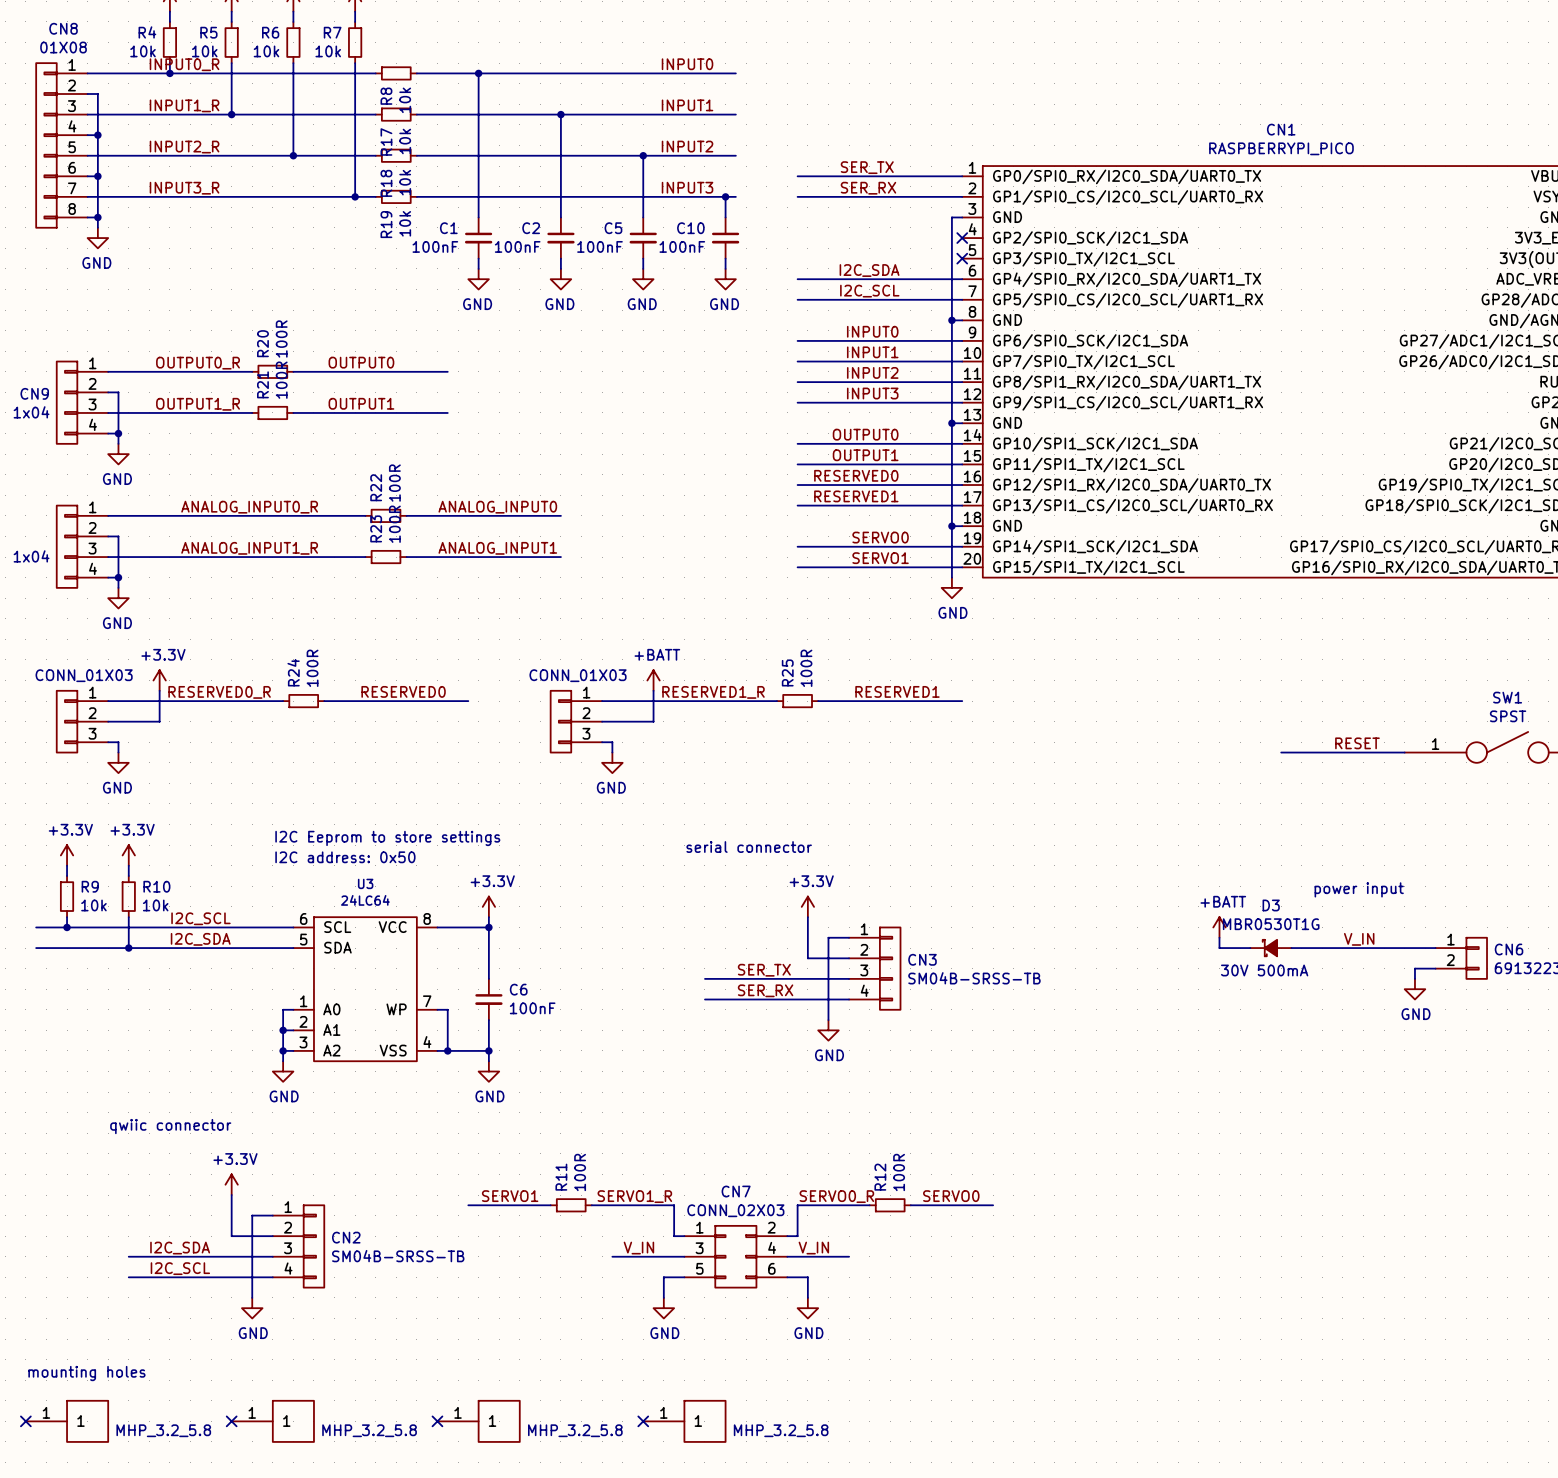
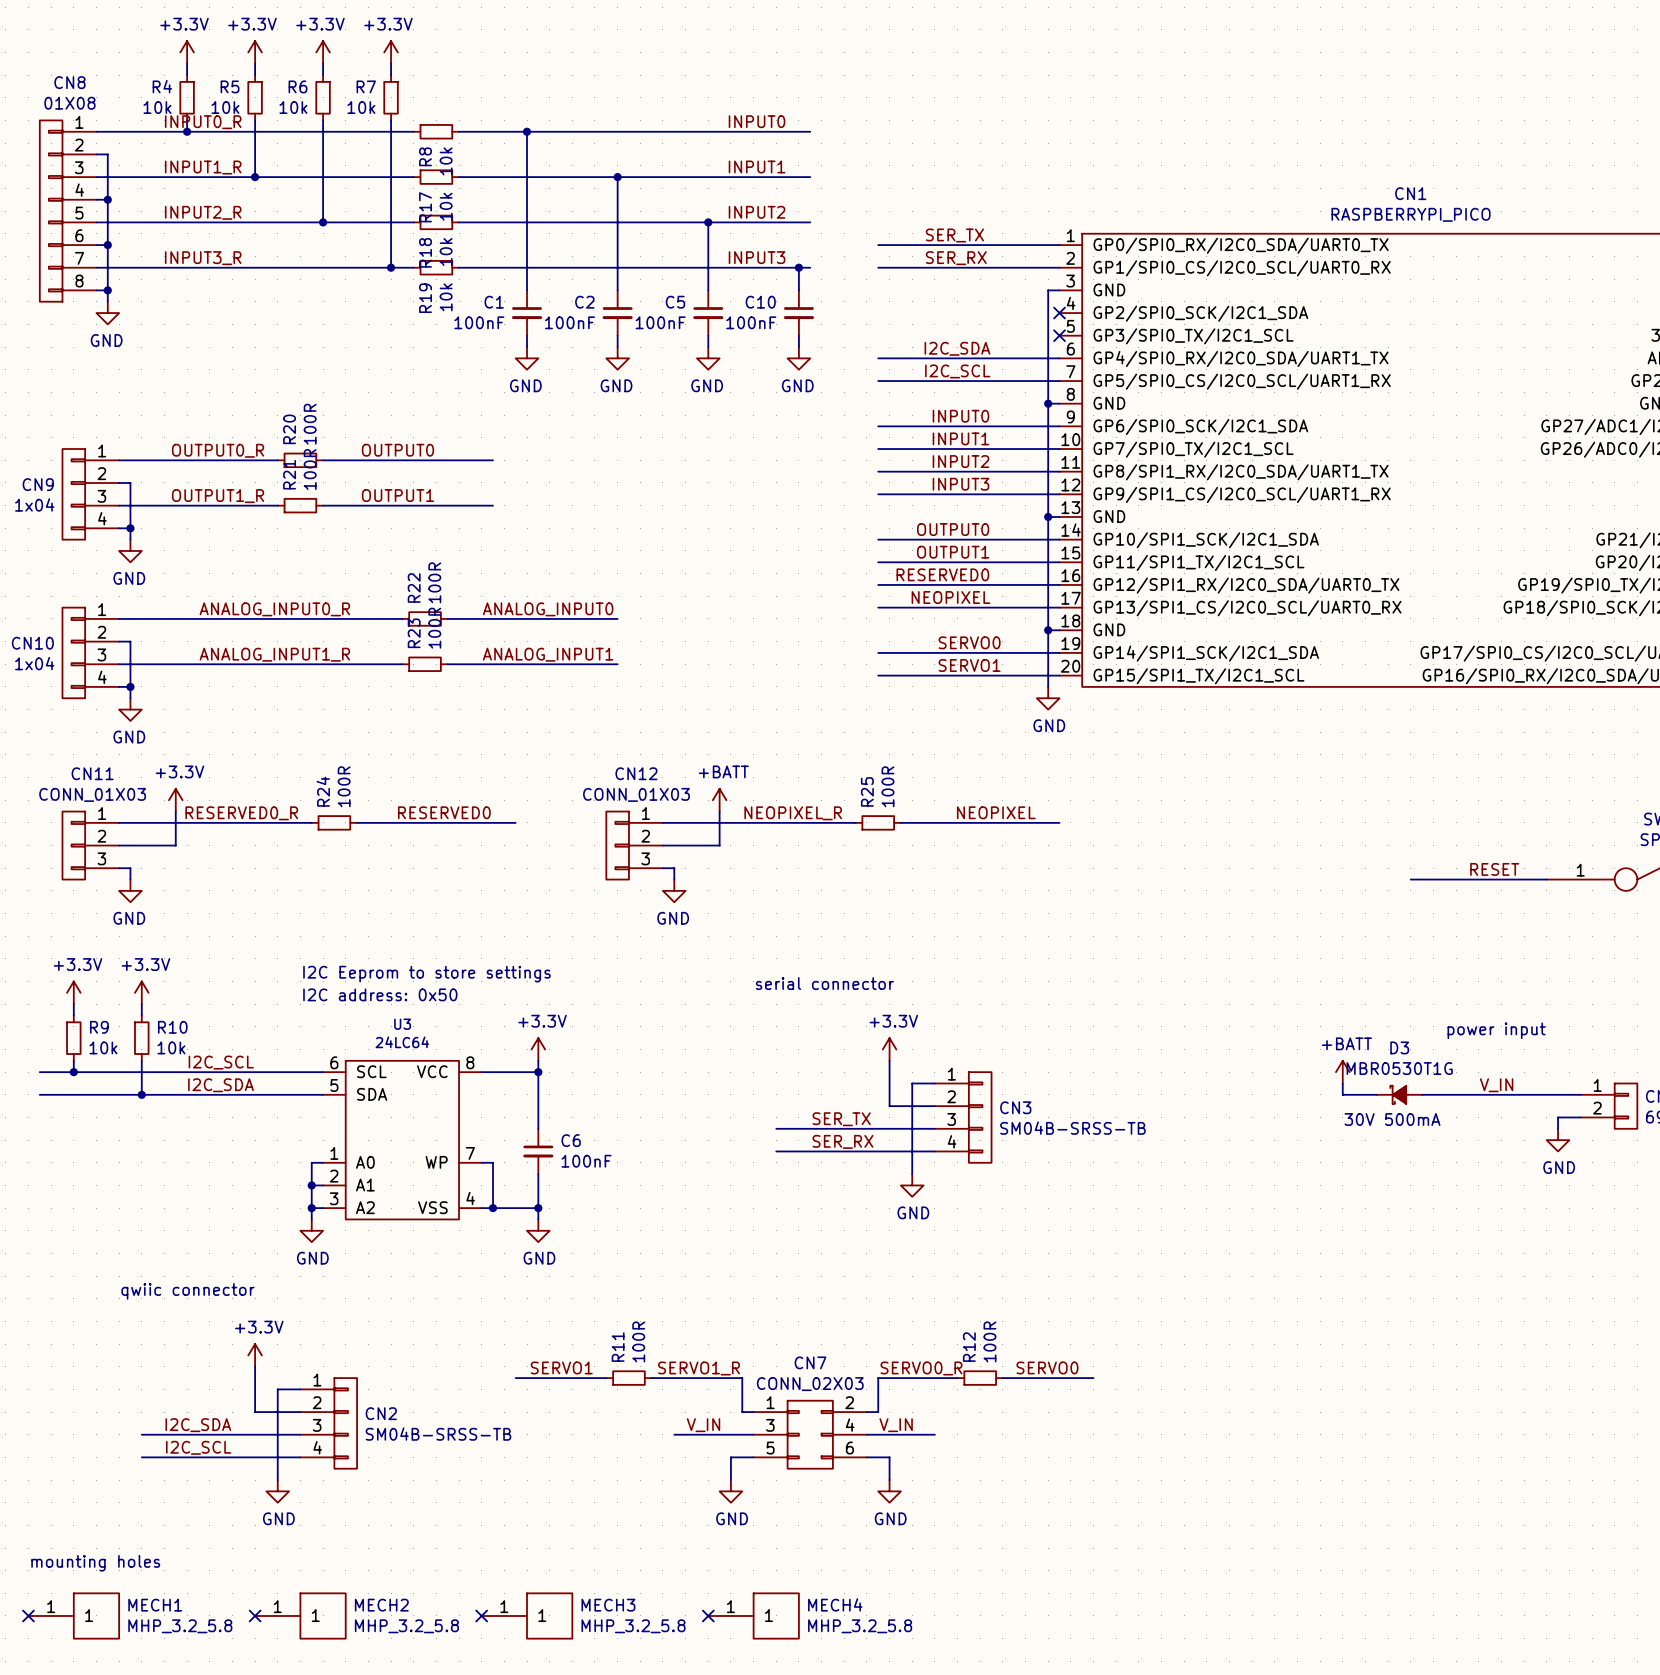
label: RESERVED1 (856, 496) -> NEOPIXEL (950, 597)
CN10 name: none -> CN10 (32, 643)
CN11 name: none -> CN11 (92, 773)
CN12 name: none -> CN12 (636, 773)
label: RESERVED1 (897, 691) -> NEOPIXEL (996, 812)
label: RESERVED1_R (713, 692) -> NEOPIXEL_R (793, 813)
MECH1 name: none -> MECH1 (155, 1605)
MECH2 name: none -> MECH2 (381, 1605)
MECH3 name: none -> MECH3 (608, 1605)
MECH4 name: none -> MECH4 (835, 1604)

